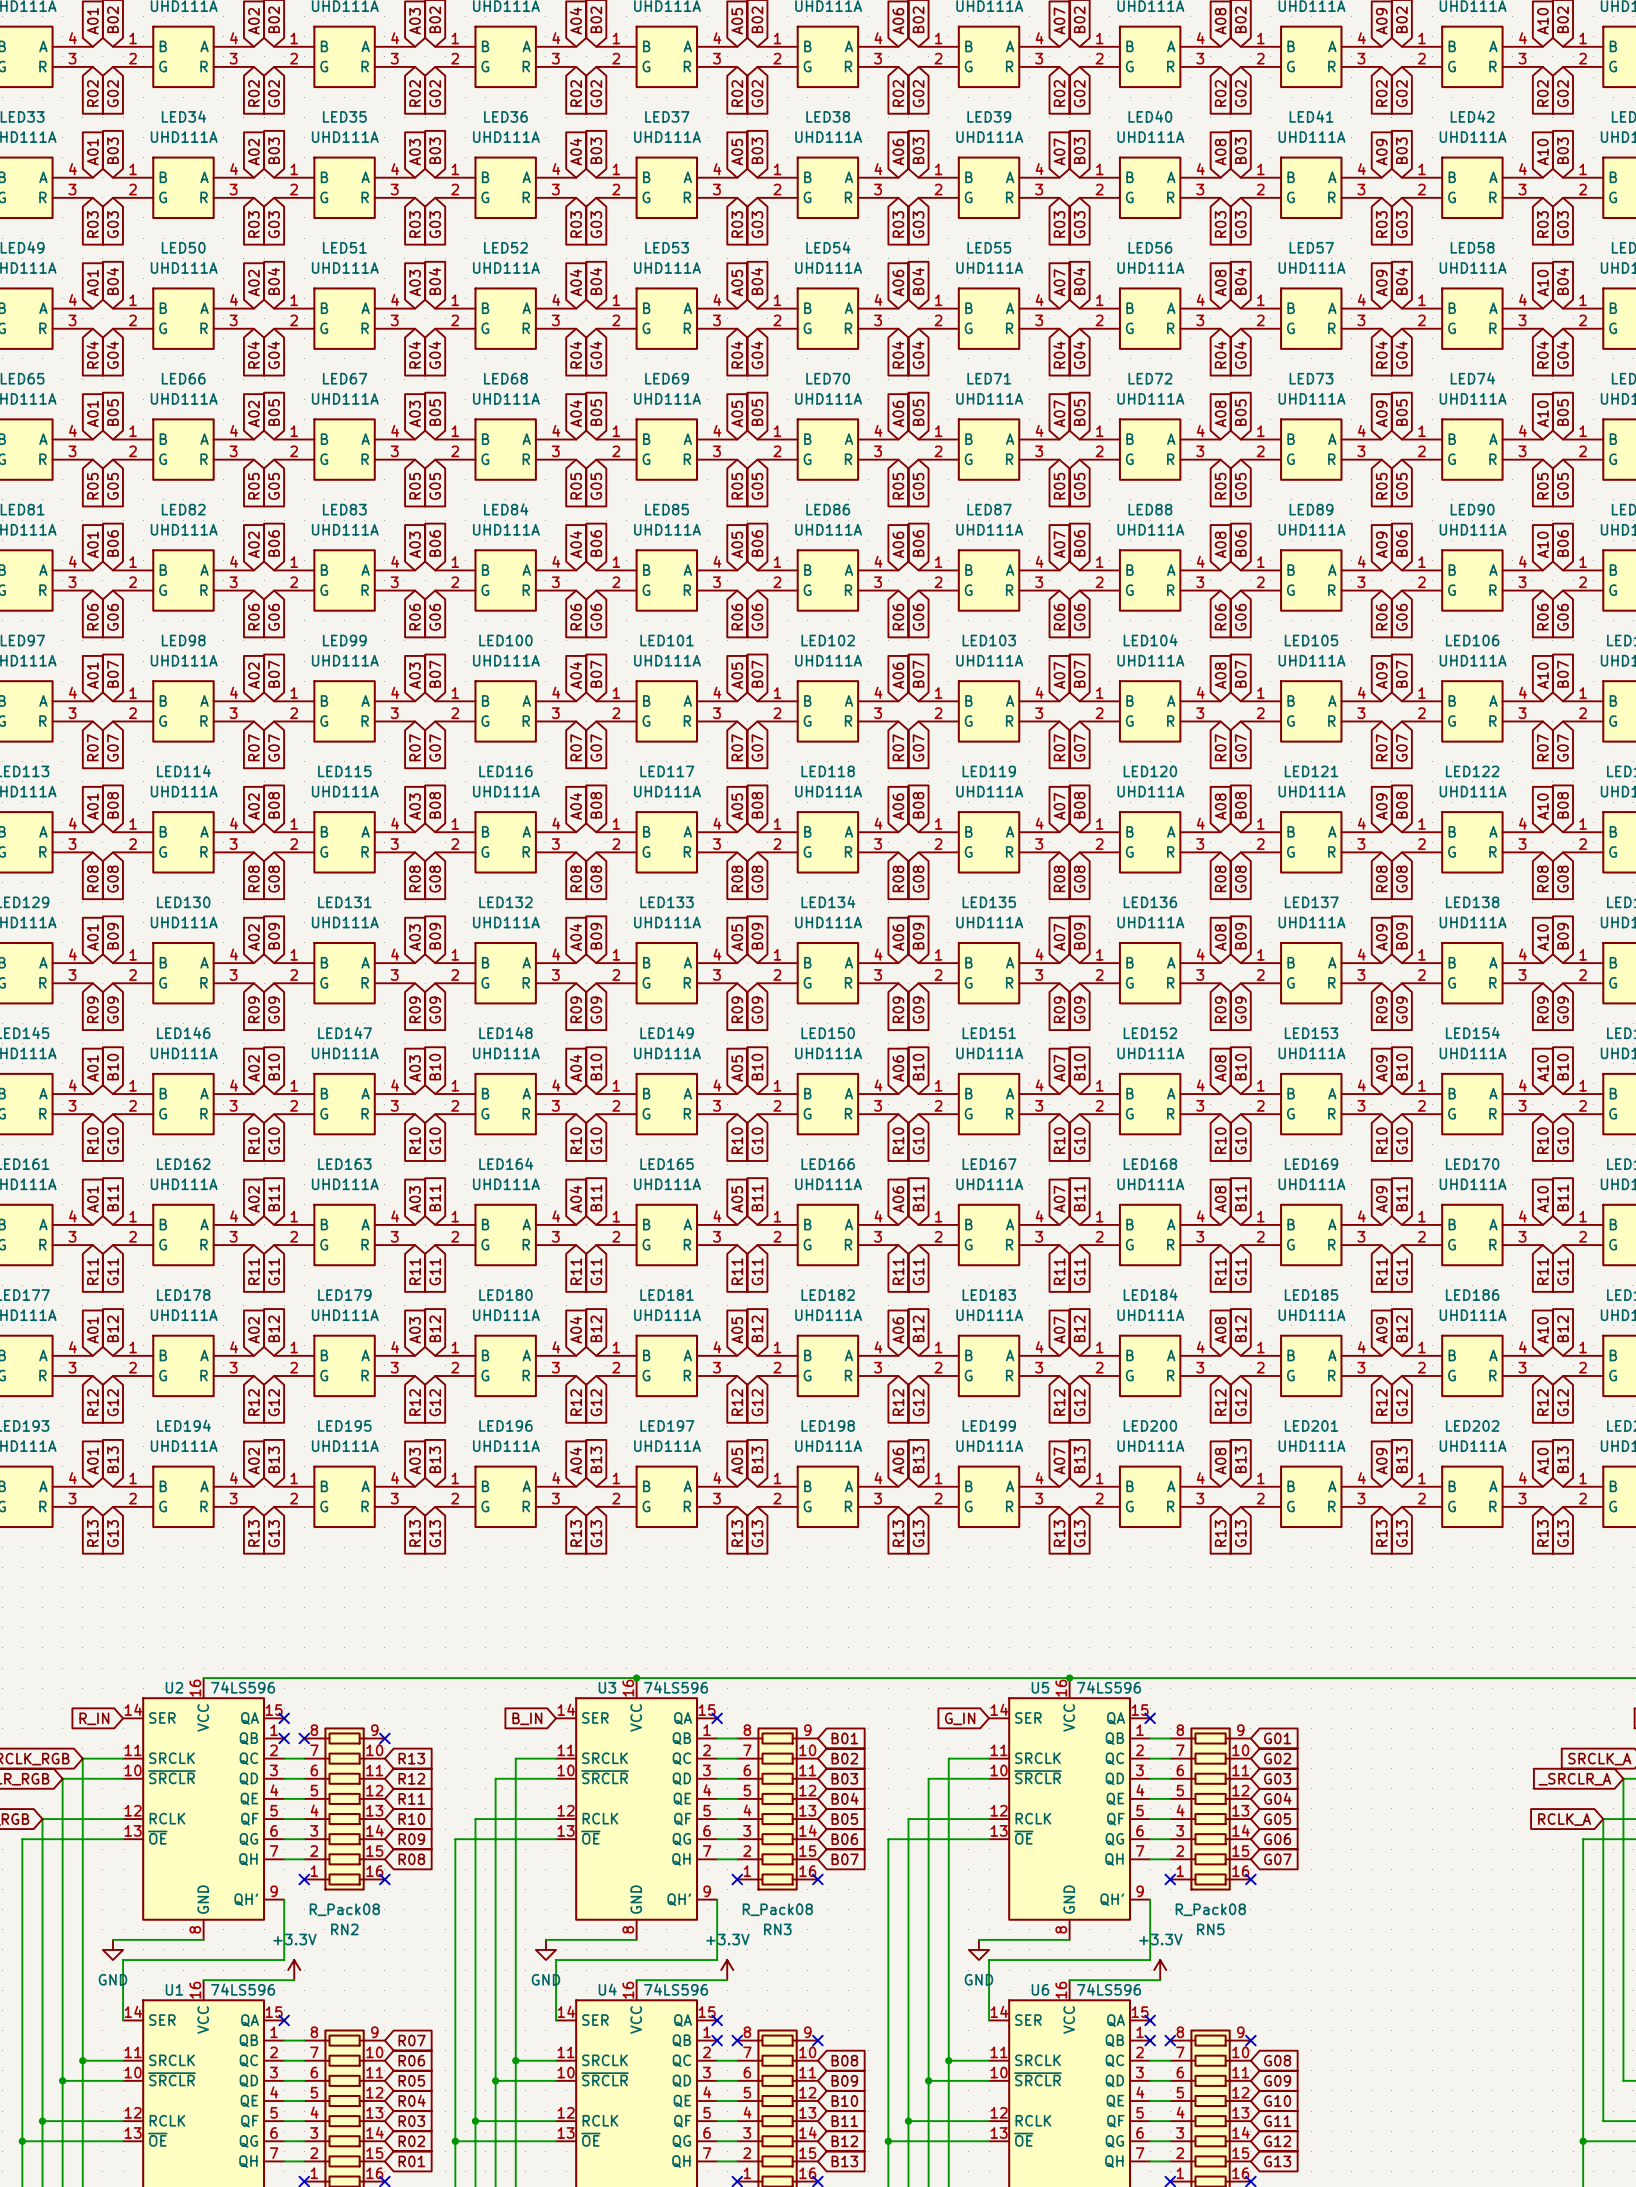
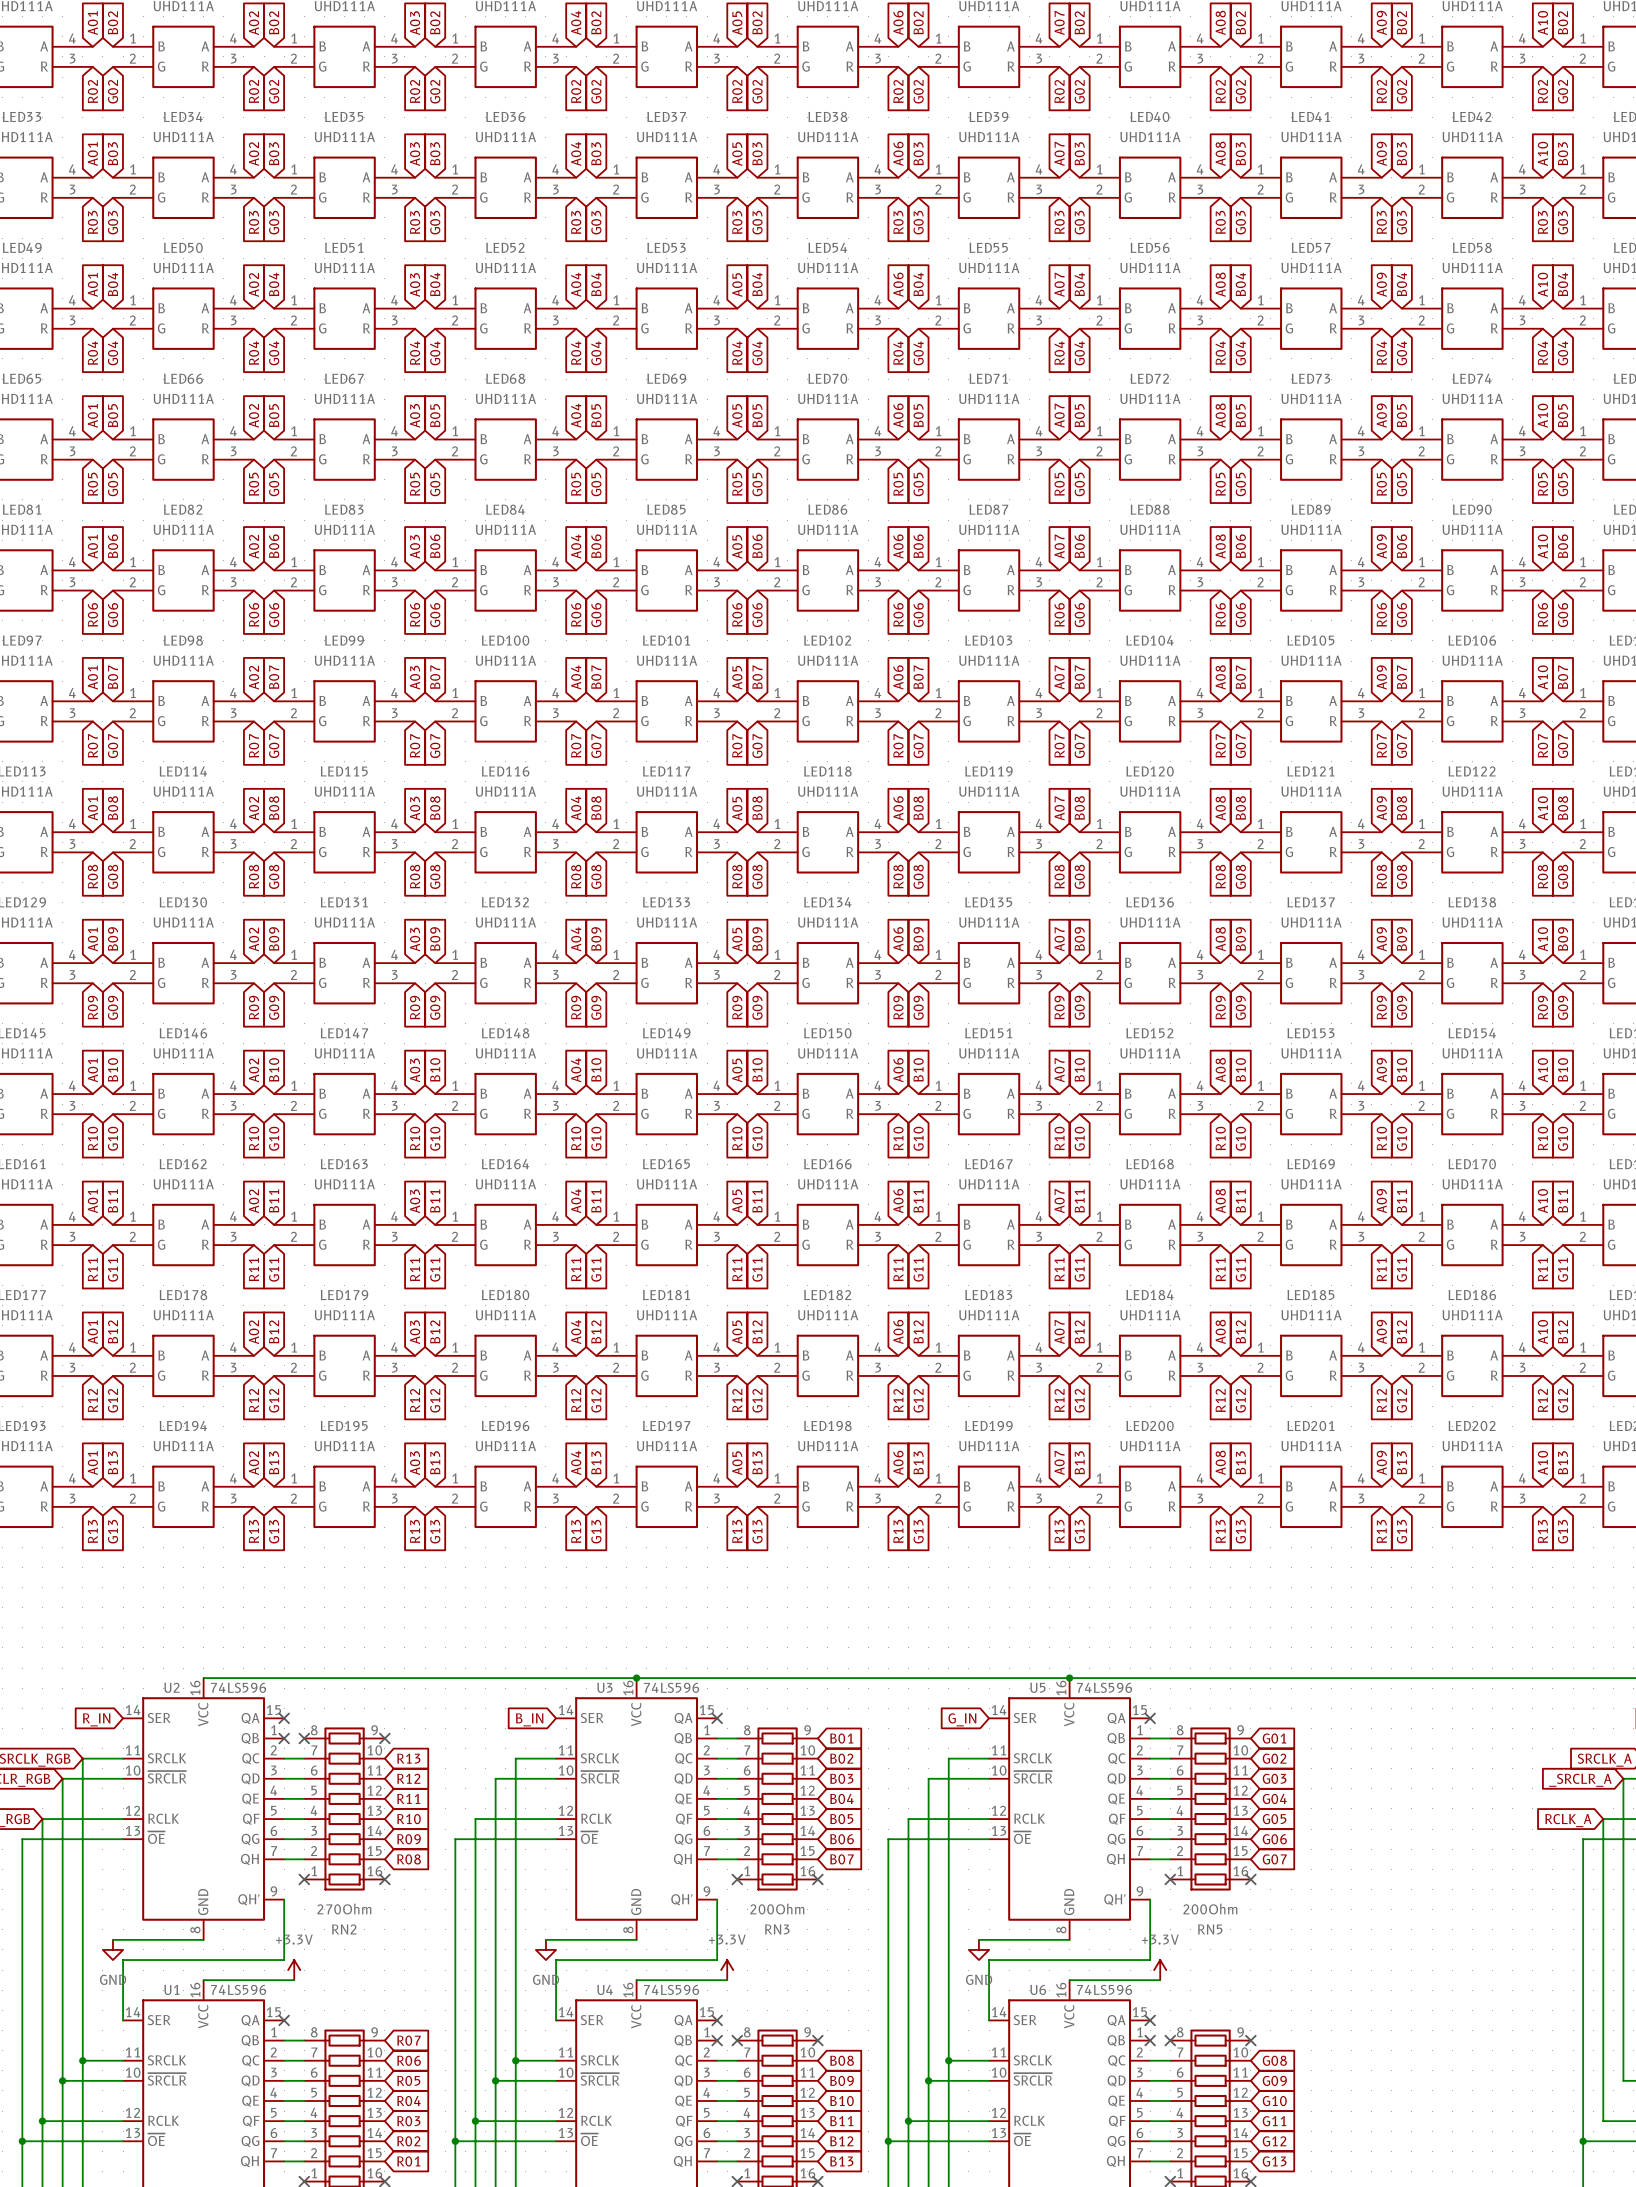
RN2 value: R_Pack08 (344, 1909) -> 270Ohm (344, 1909)
RN3 value: R_Pack08 (777, 1909) -> 200Ohm (777, 1909)
RN5 value: R_Pack08 (1210, 1909) -> 200Ohm (1210, 1909)

